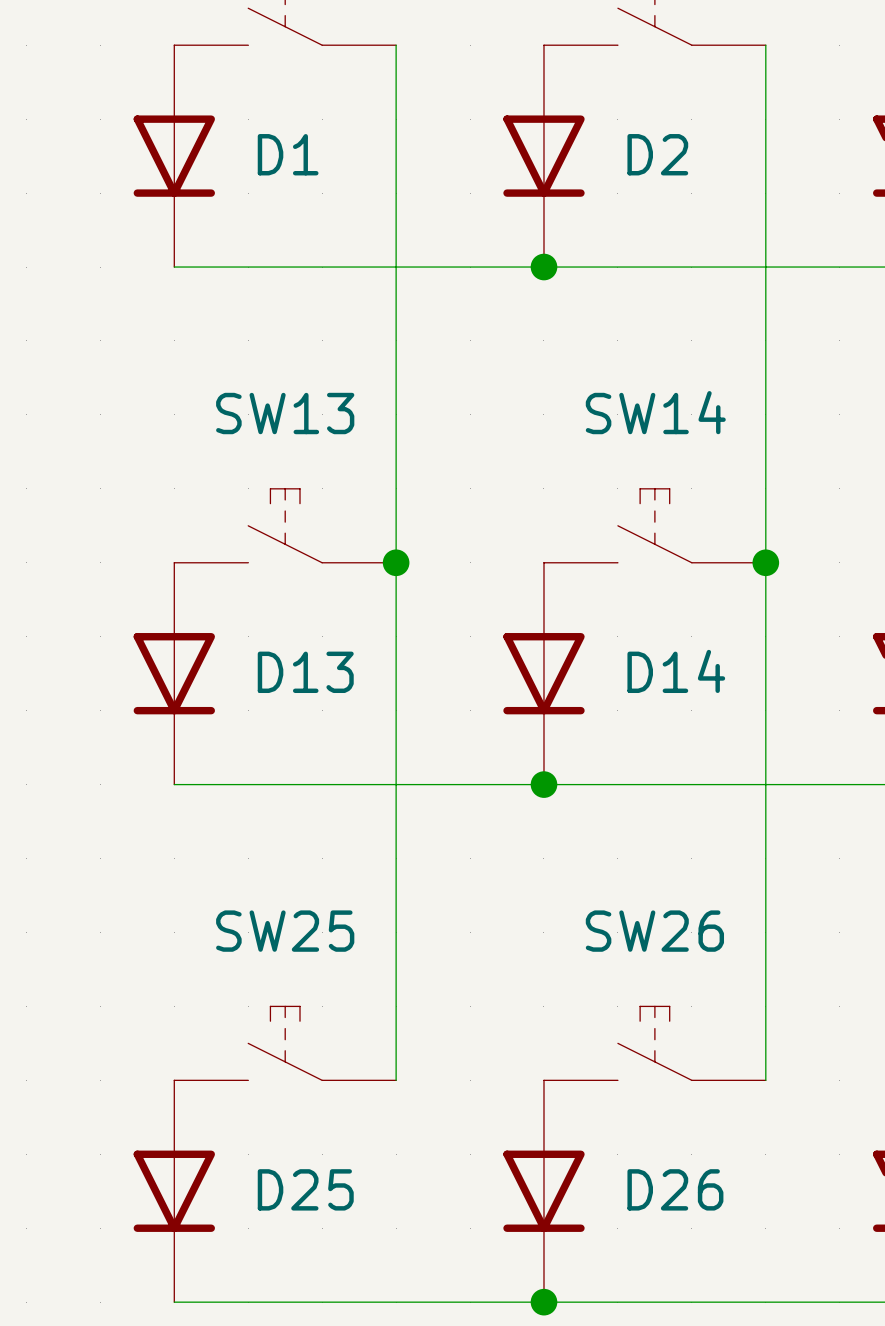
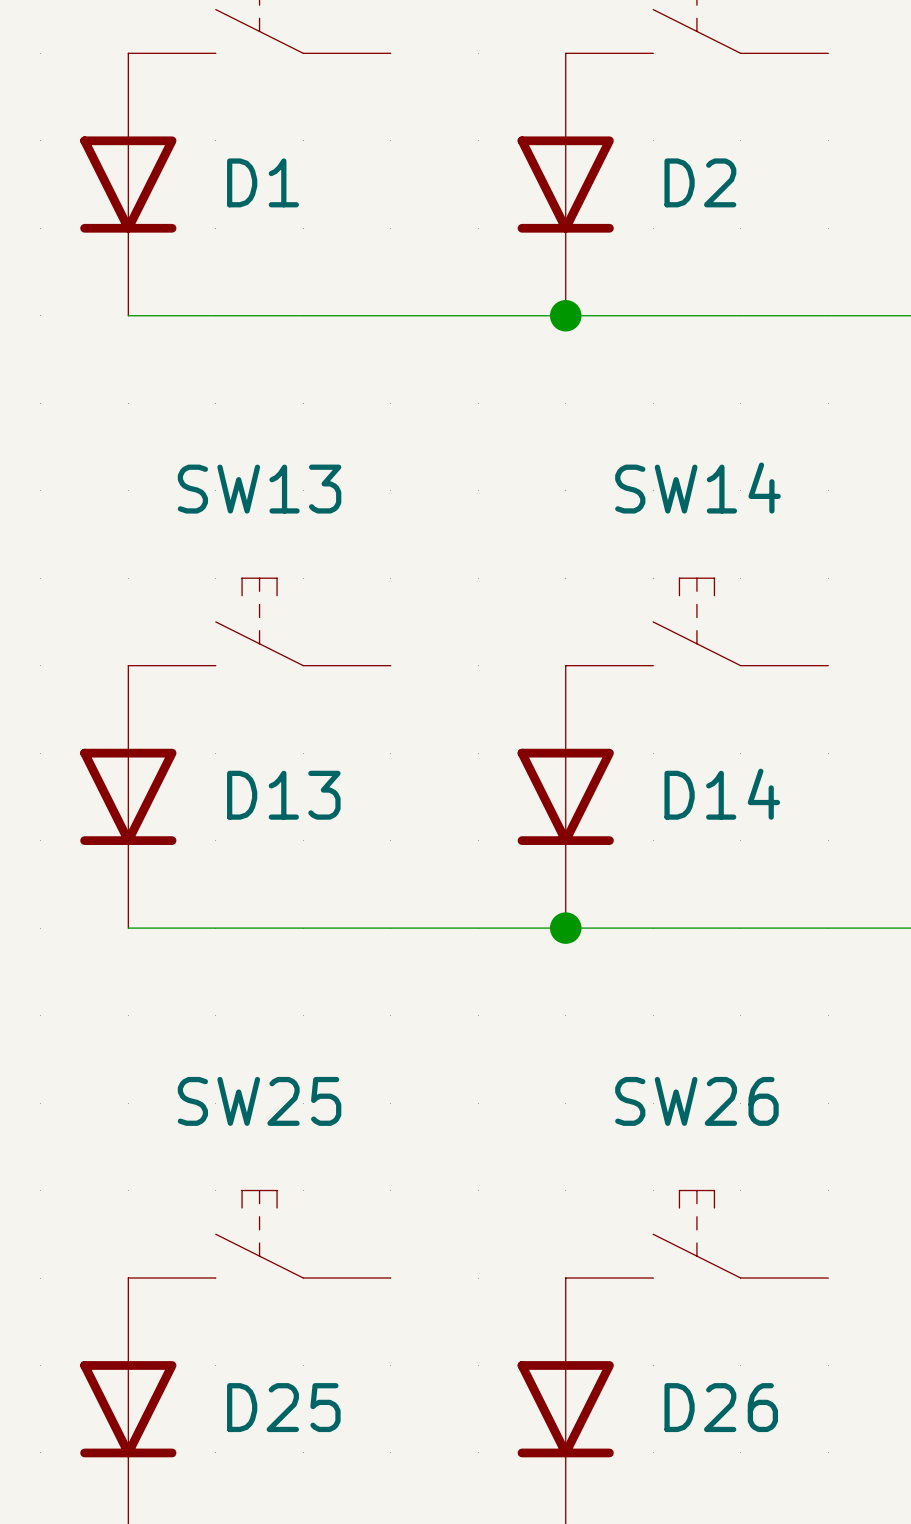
wire: (396, 45) (396, 1080) -> none
wire: (765, 45) (765, 1080) -> none
junction: (396, 562) -> none
junction: (765, 562) -> none

